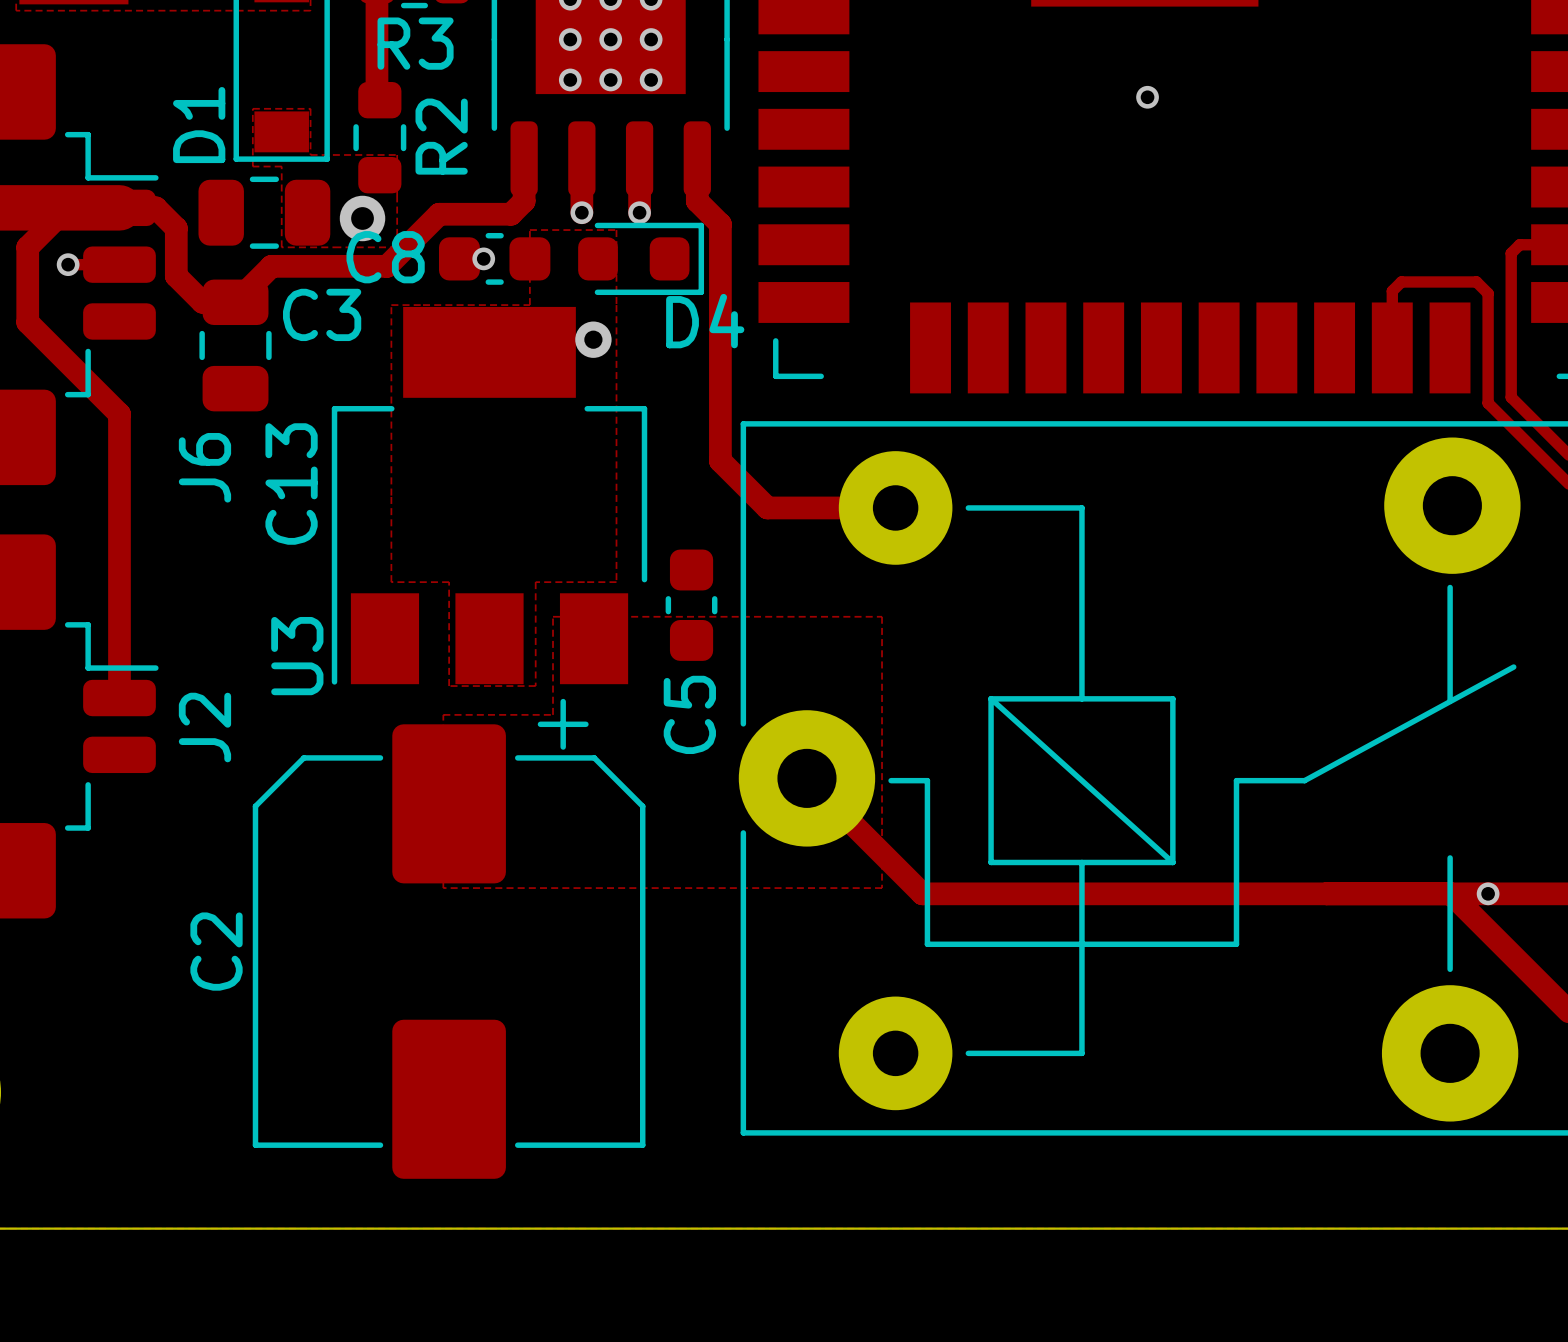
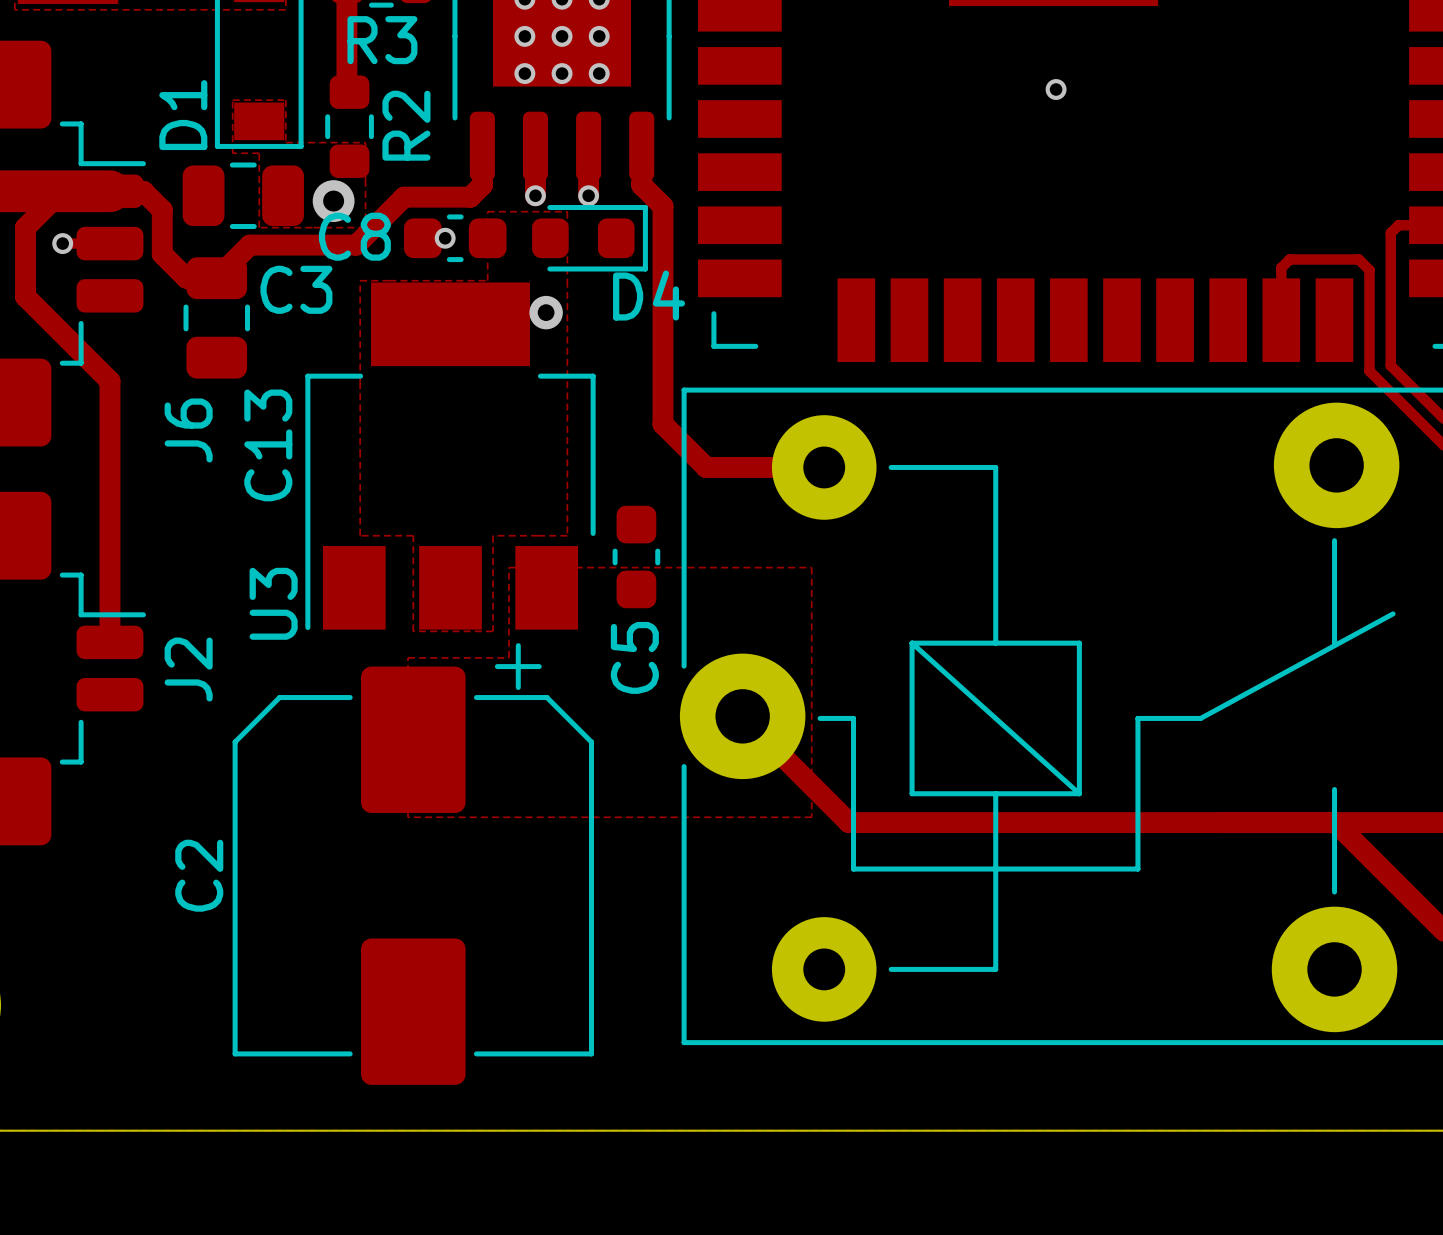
via: (1488, 893) -> none

